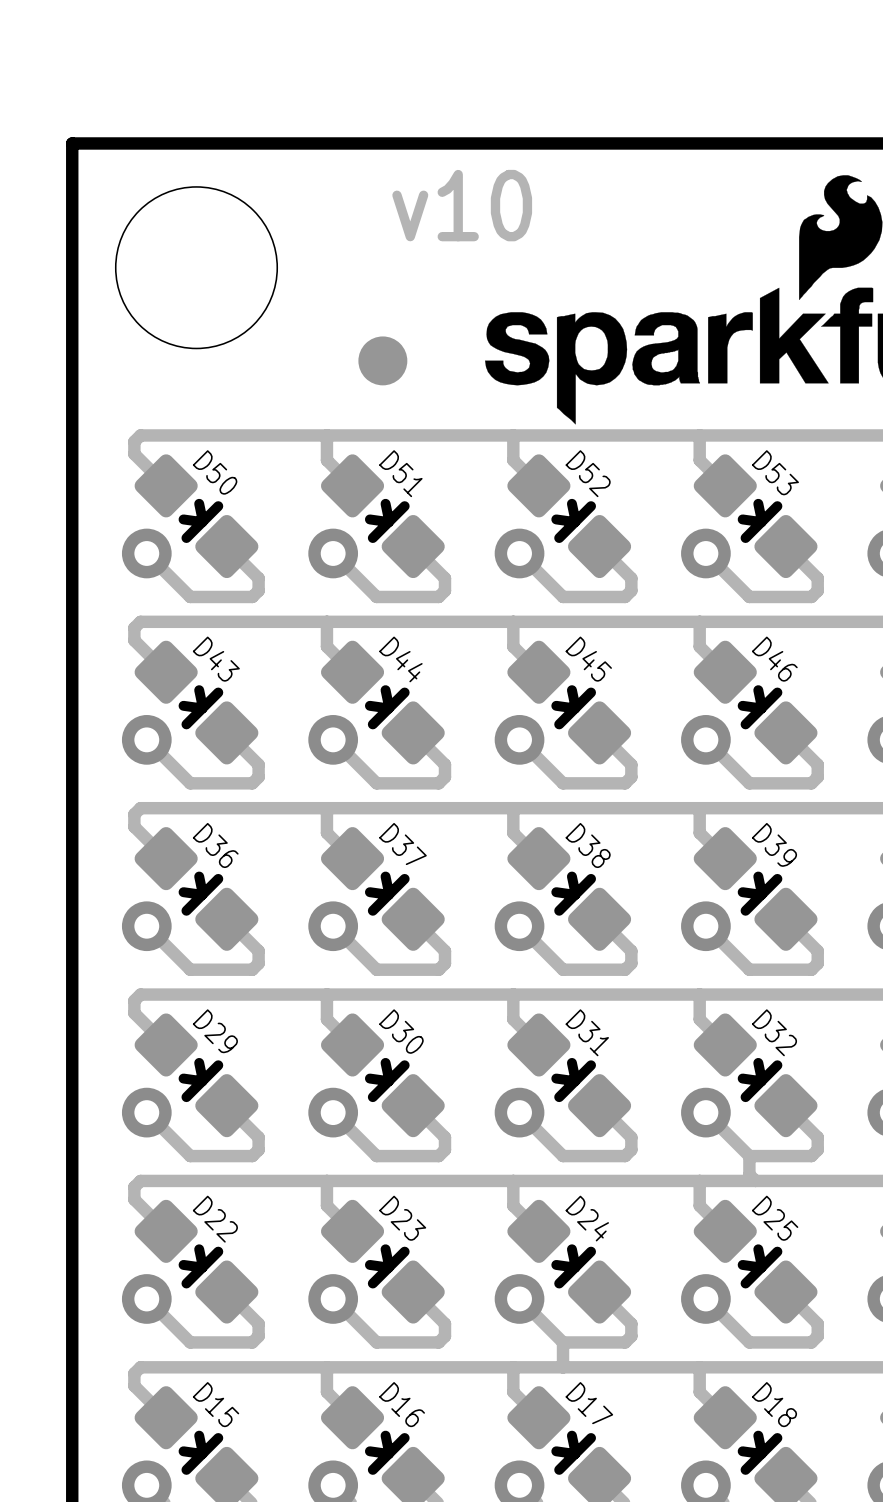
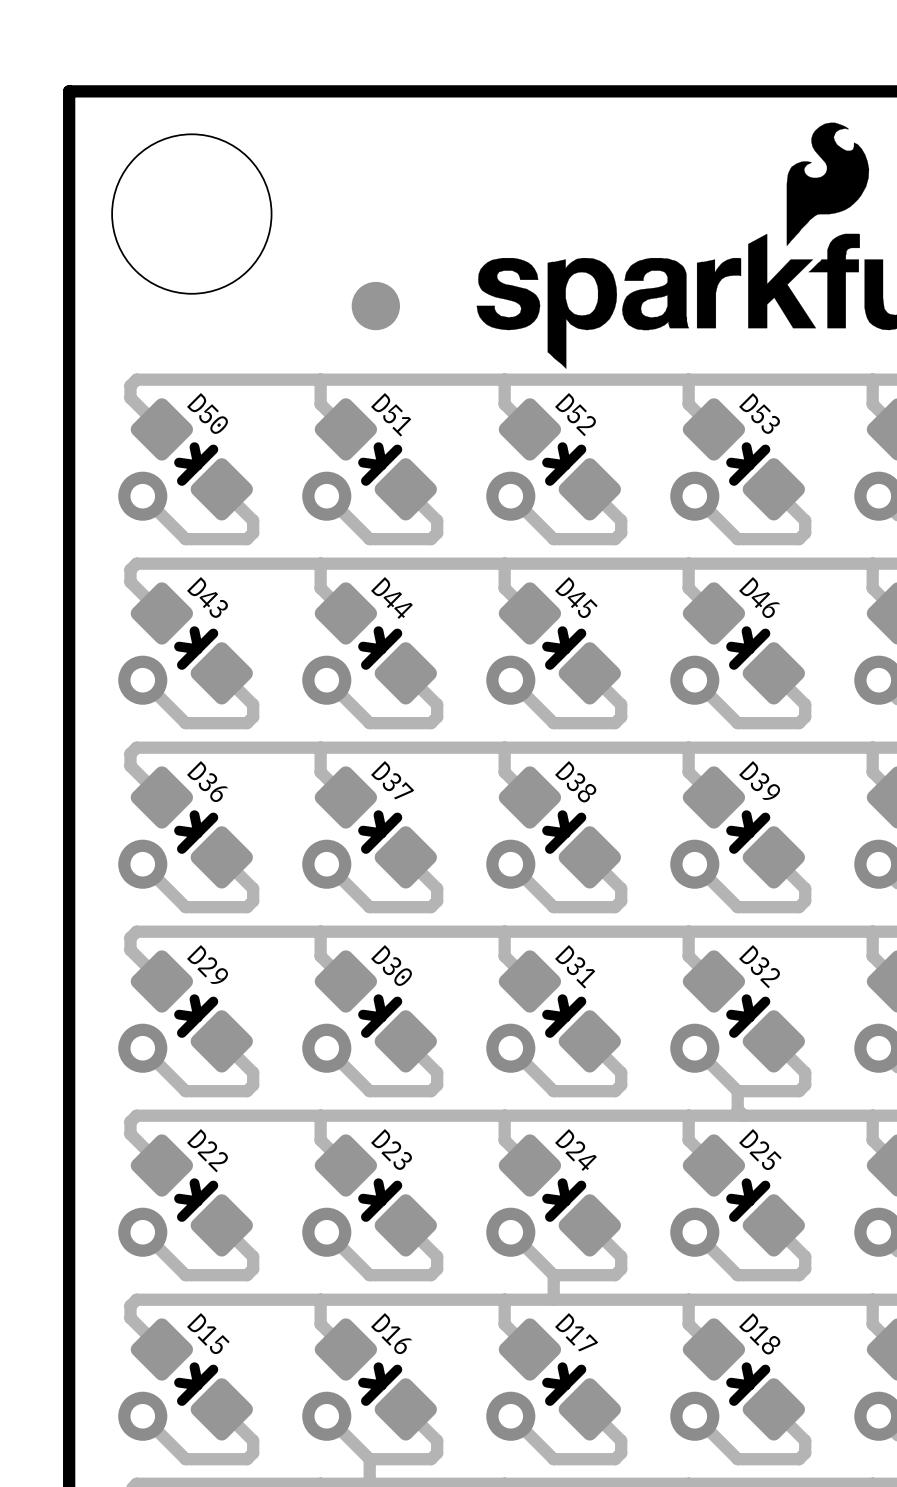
drawing: [392, 169, 533, 242] -> none

